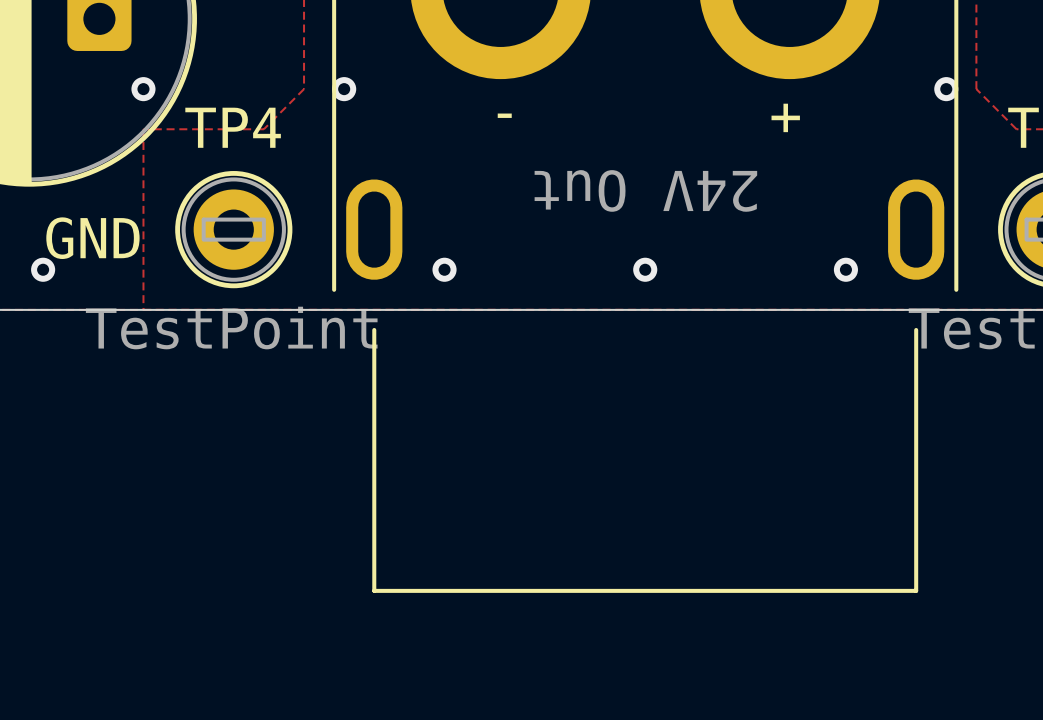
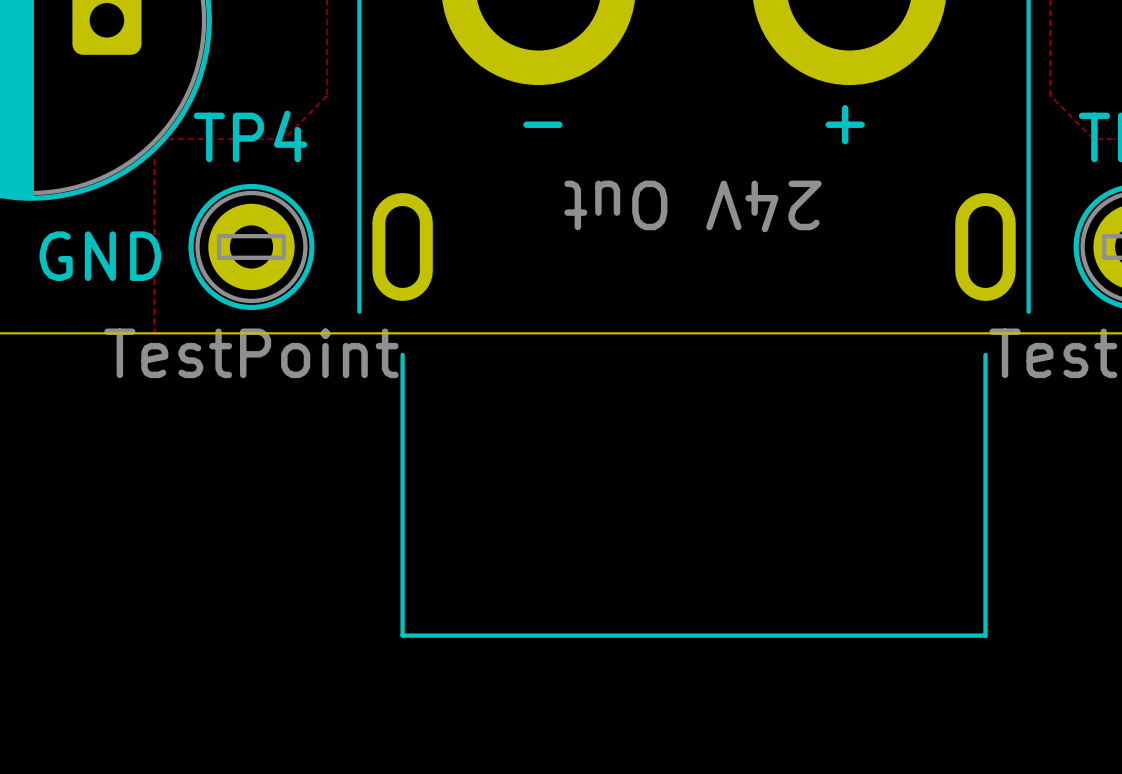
via: (143, 89) -> none
via: (344, 89) -> none
via: (946, 89) -> none
via: (43, 269) -> none
via: (444, 269) -> none
via: (645, 269) -> none
via: (845, 269) -> none

